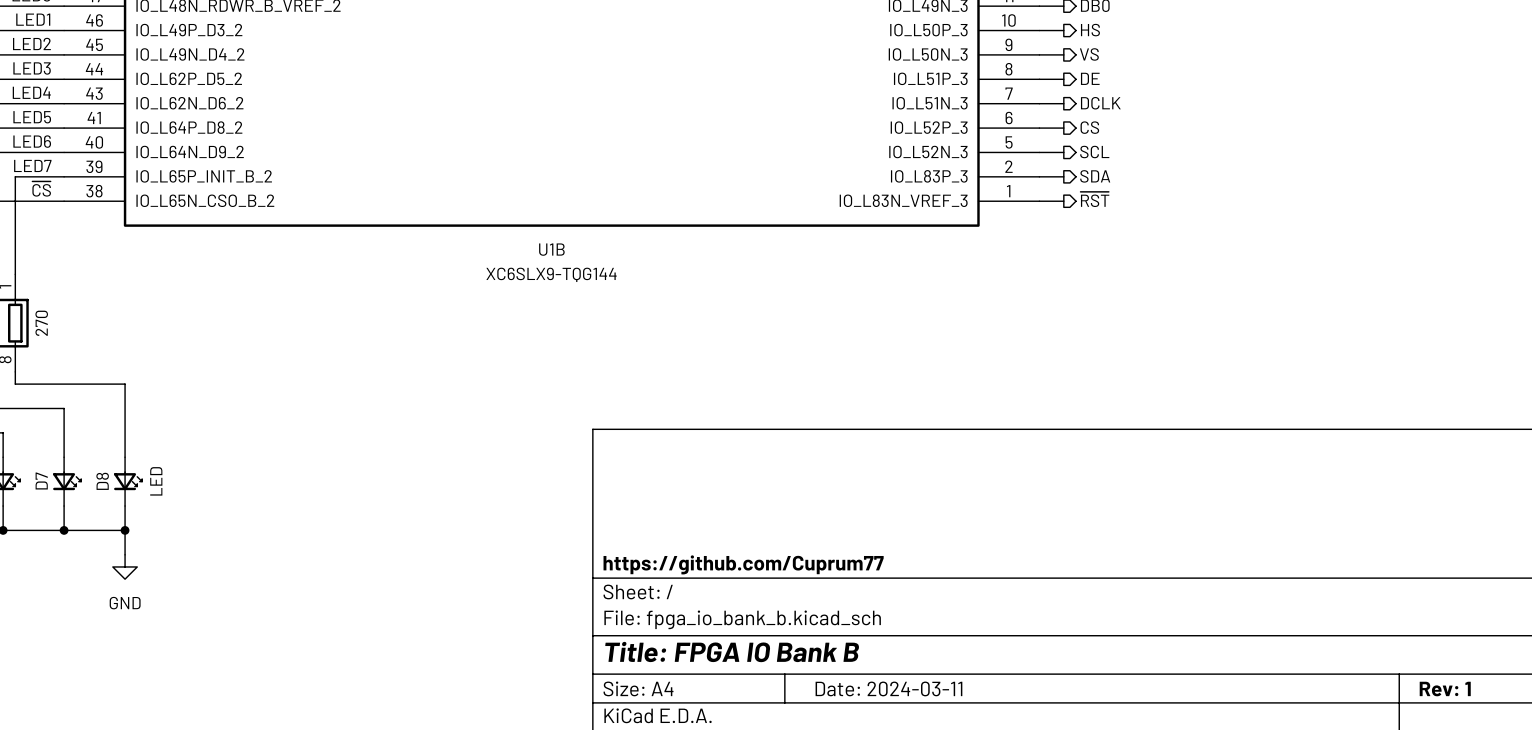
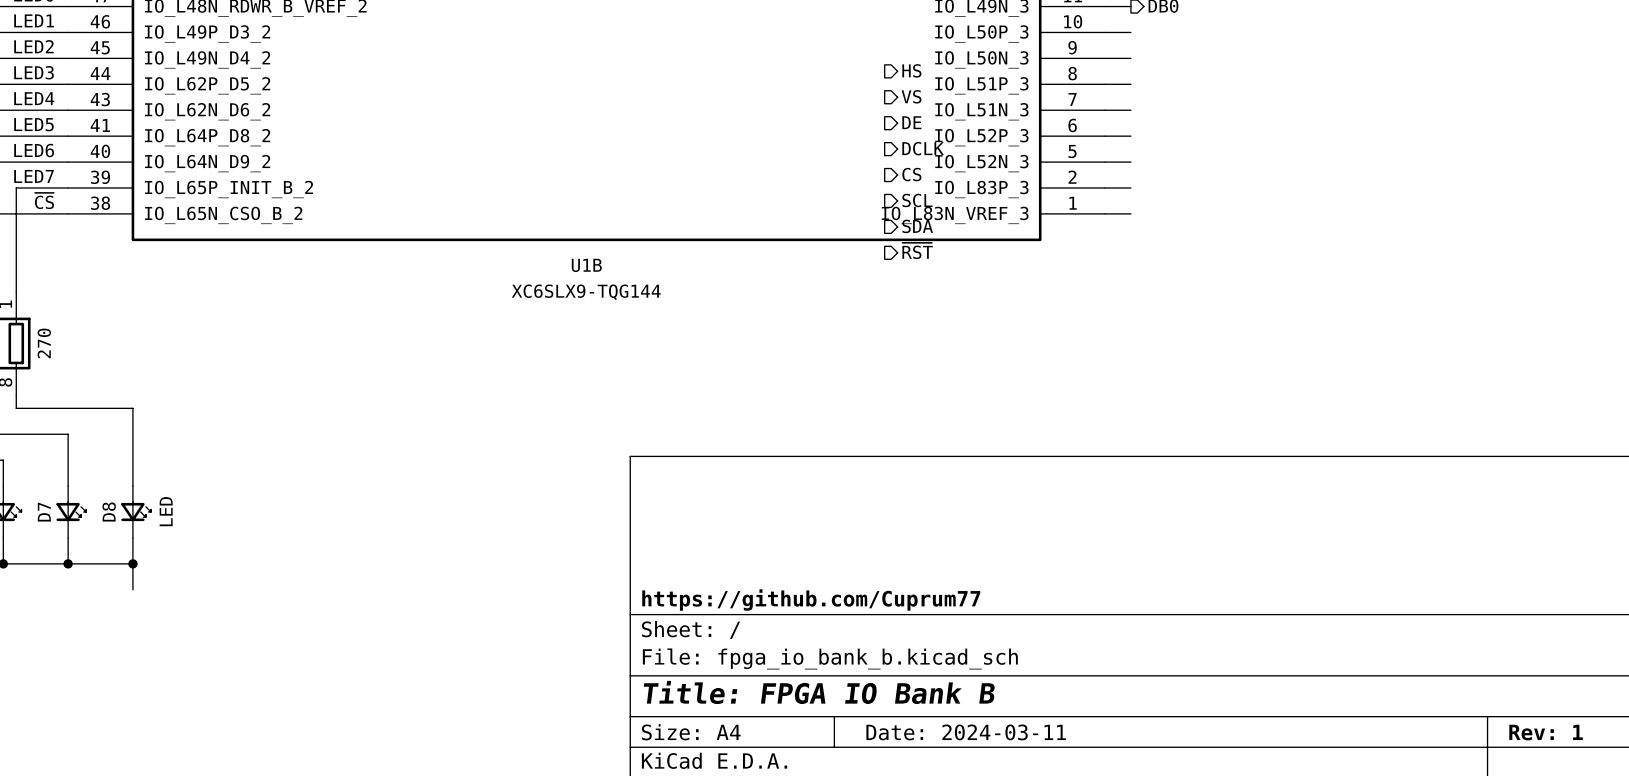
hierarchical label position: HS (1090, 30) -> HS (911, 70)
hierarchical label position: VS (1089, 54) -> VS (911, 96)
hierarchical label position: DE (1090, 78) -> DE (911, 122)
hierarchical label position: DCLK (1100, 103) -> DCLK (923, 148)
hierarchical label position: CS (1089, 127) -> CS (911, 174)
hierarchical label position: SCL (1094, 152) -> SCL (917, 200)
hierarchical label position: SDA (1095, 176) -> SDA (917, 226)
hierarchical label position: ~{RST} (1094, 199) -> ~{RST} (917, 250)
power symbol: GND (125, 566) -> none

